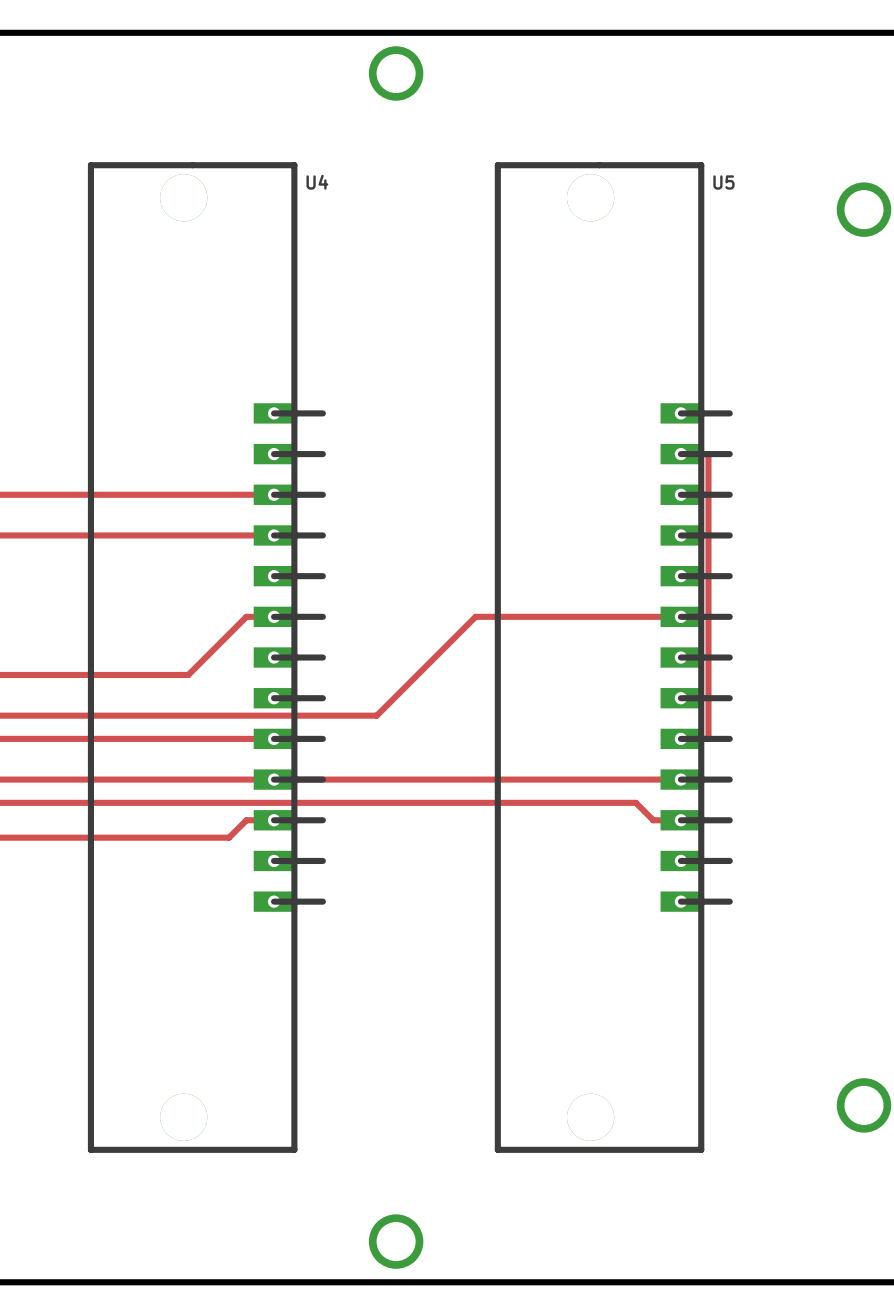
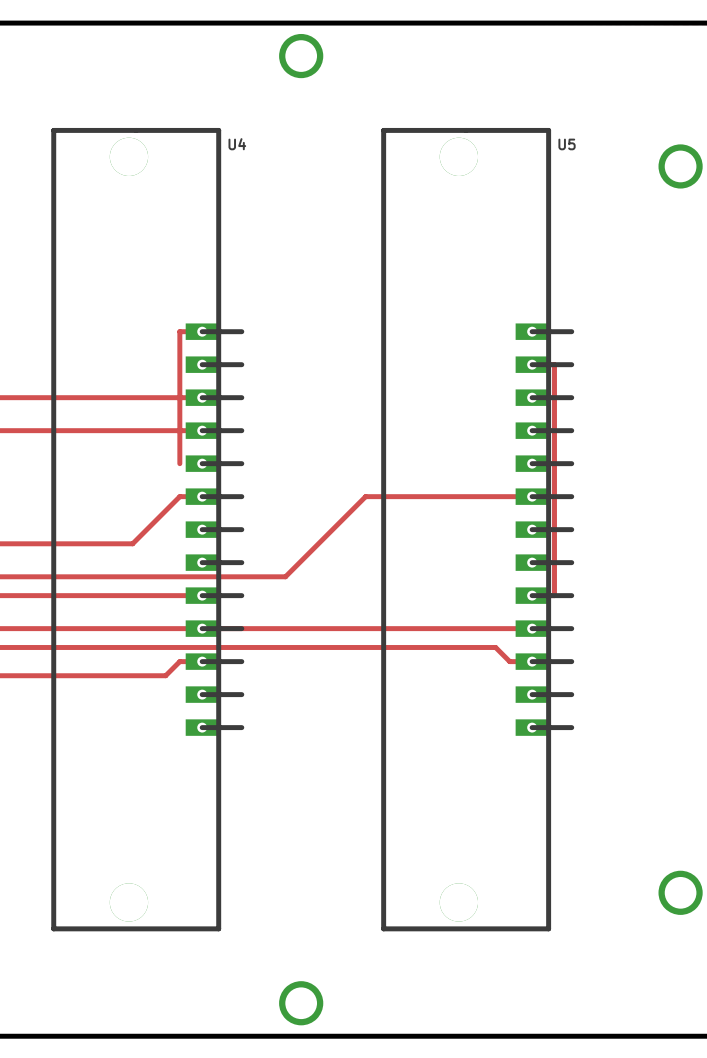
track: none -> (202, 331) (179, 331) (179, 463)

